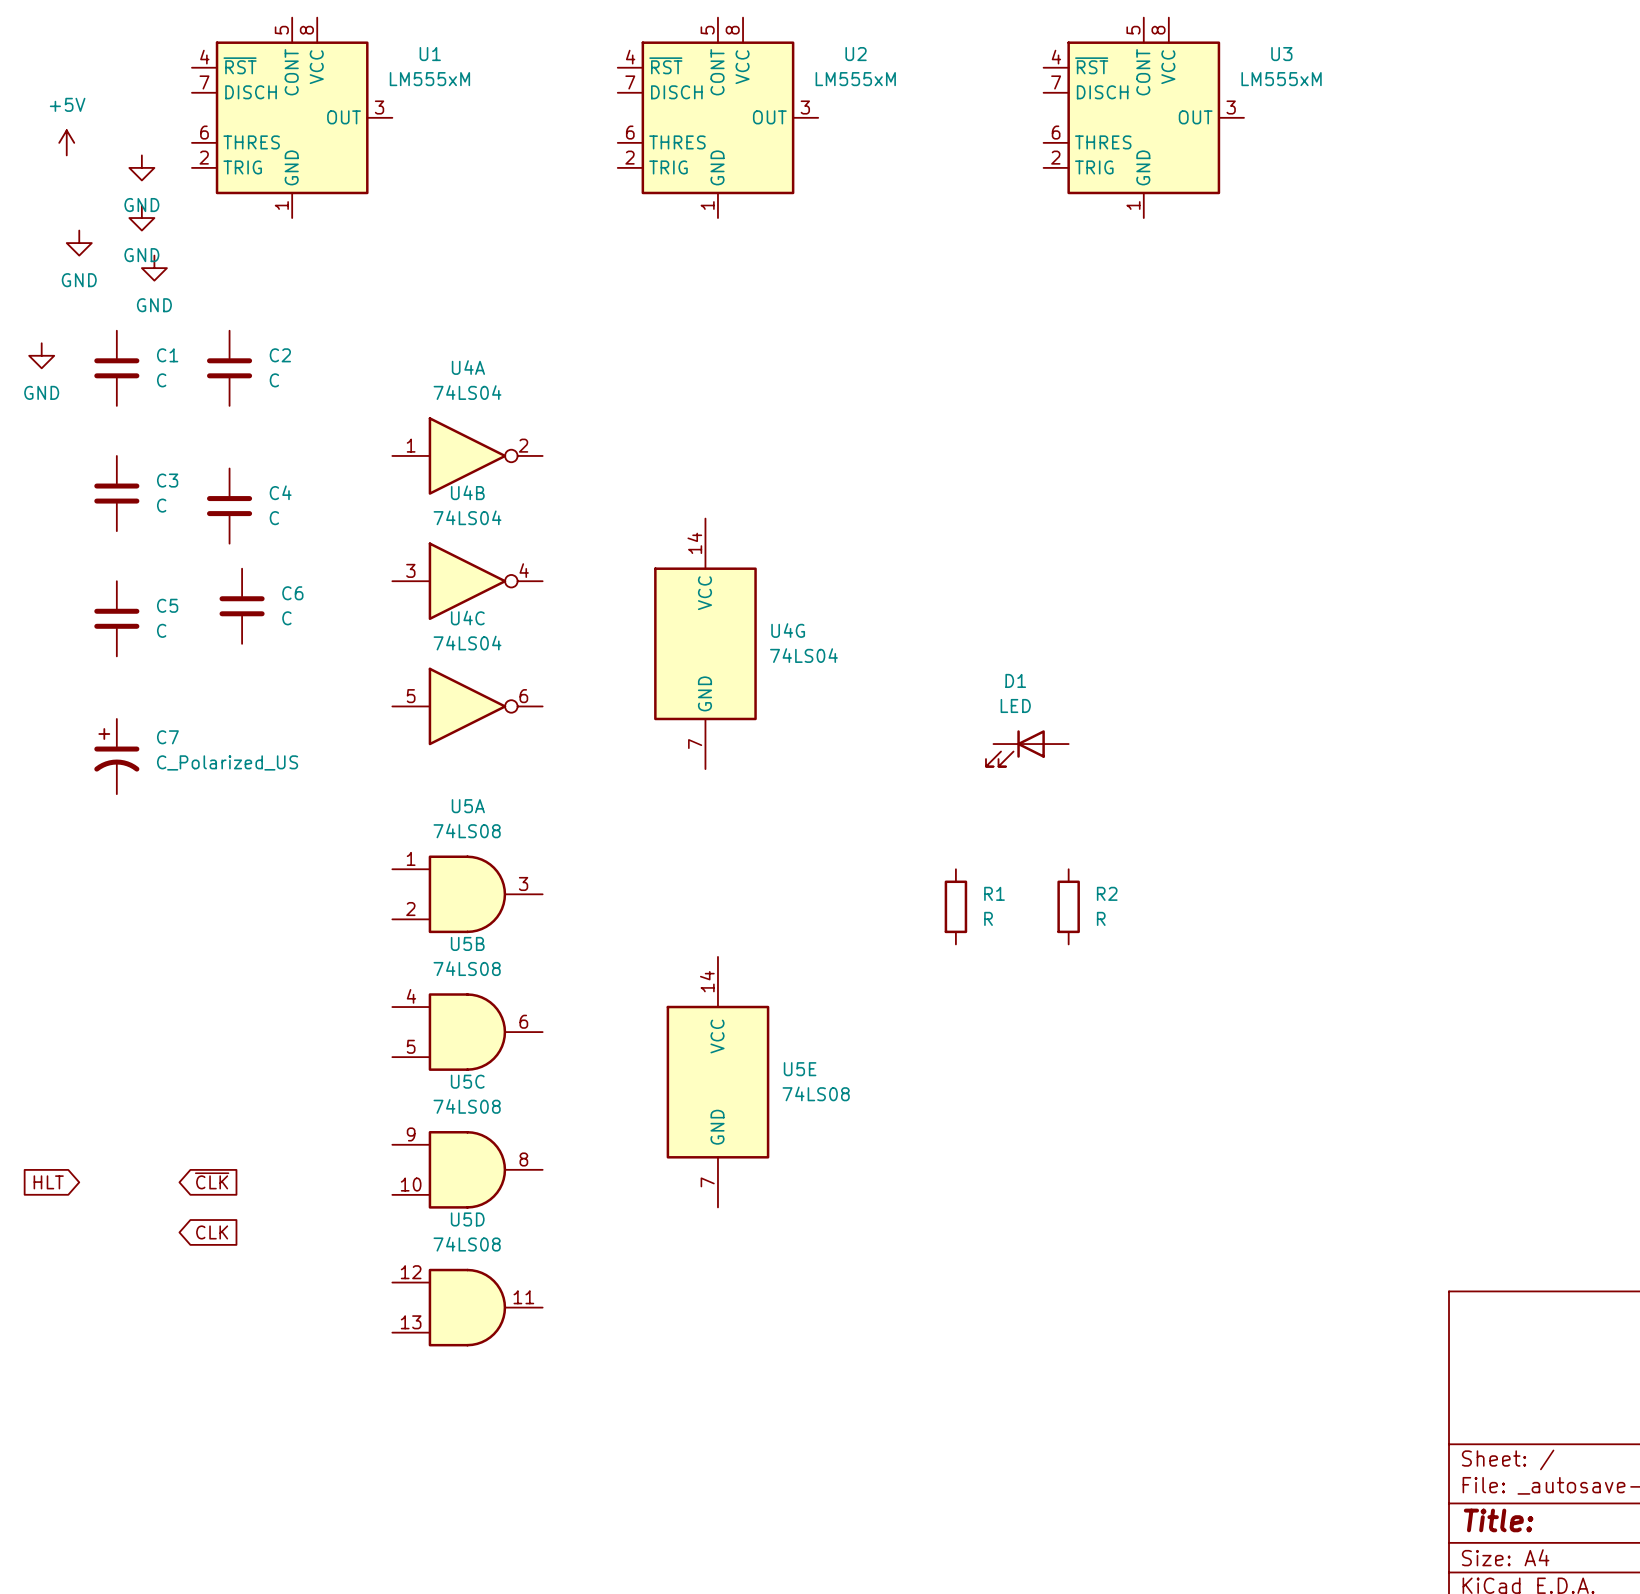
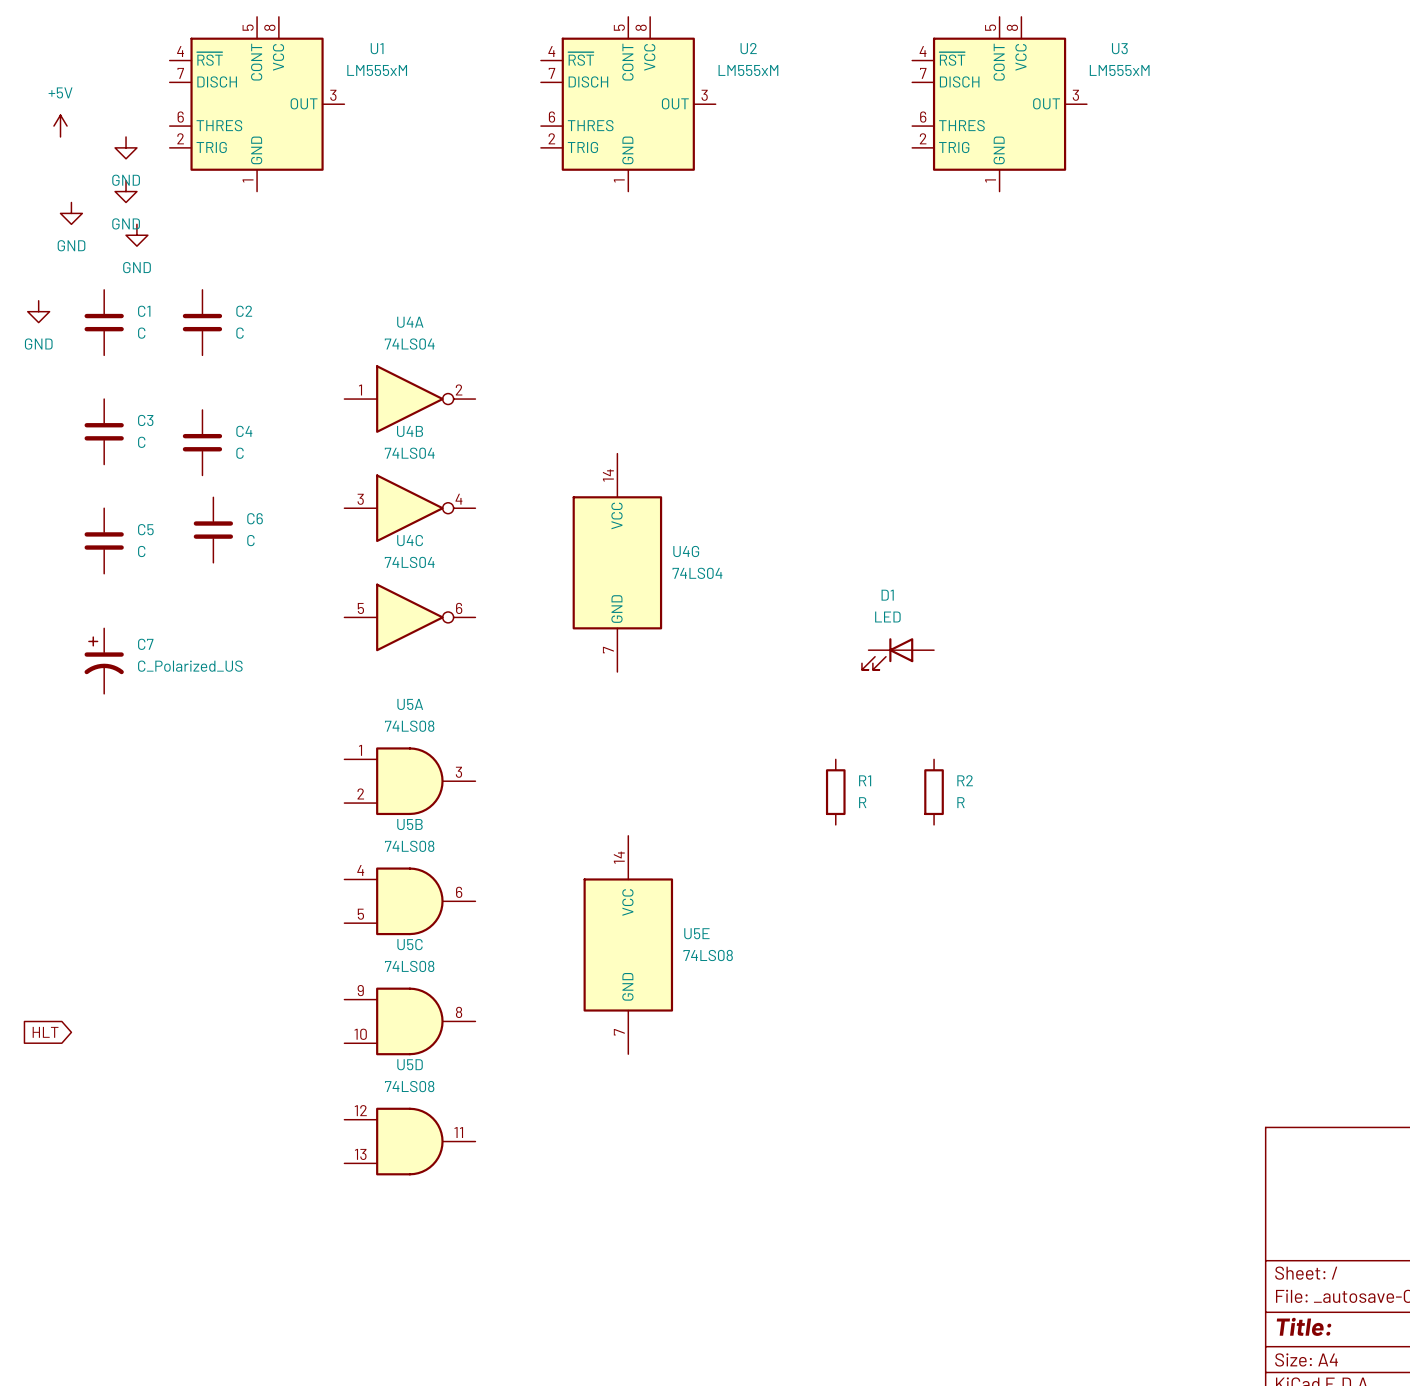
global label: ~{CLK} (212, 1180) -> none
global label: CLK (212, 1232) -> none

